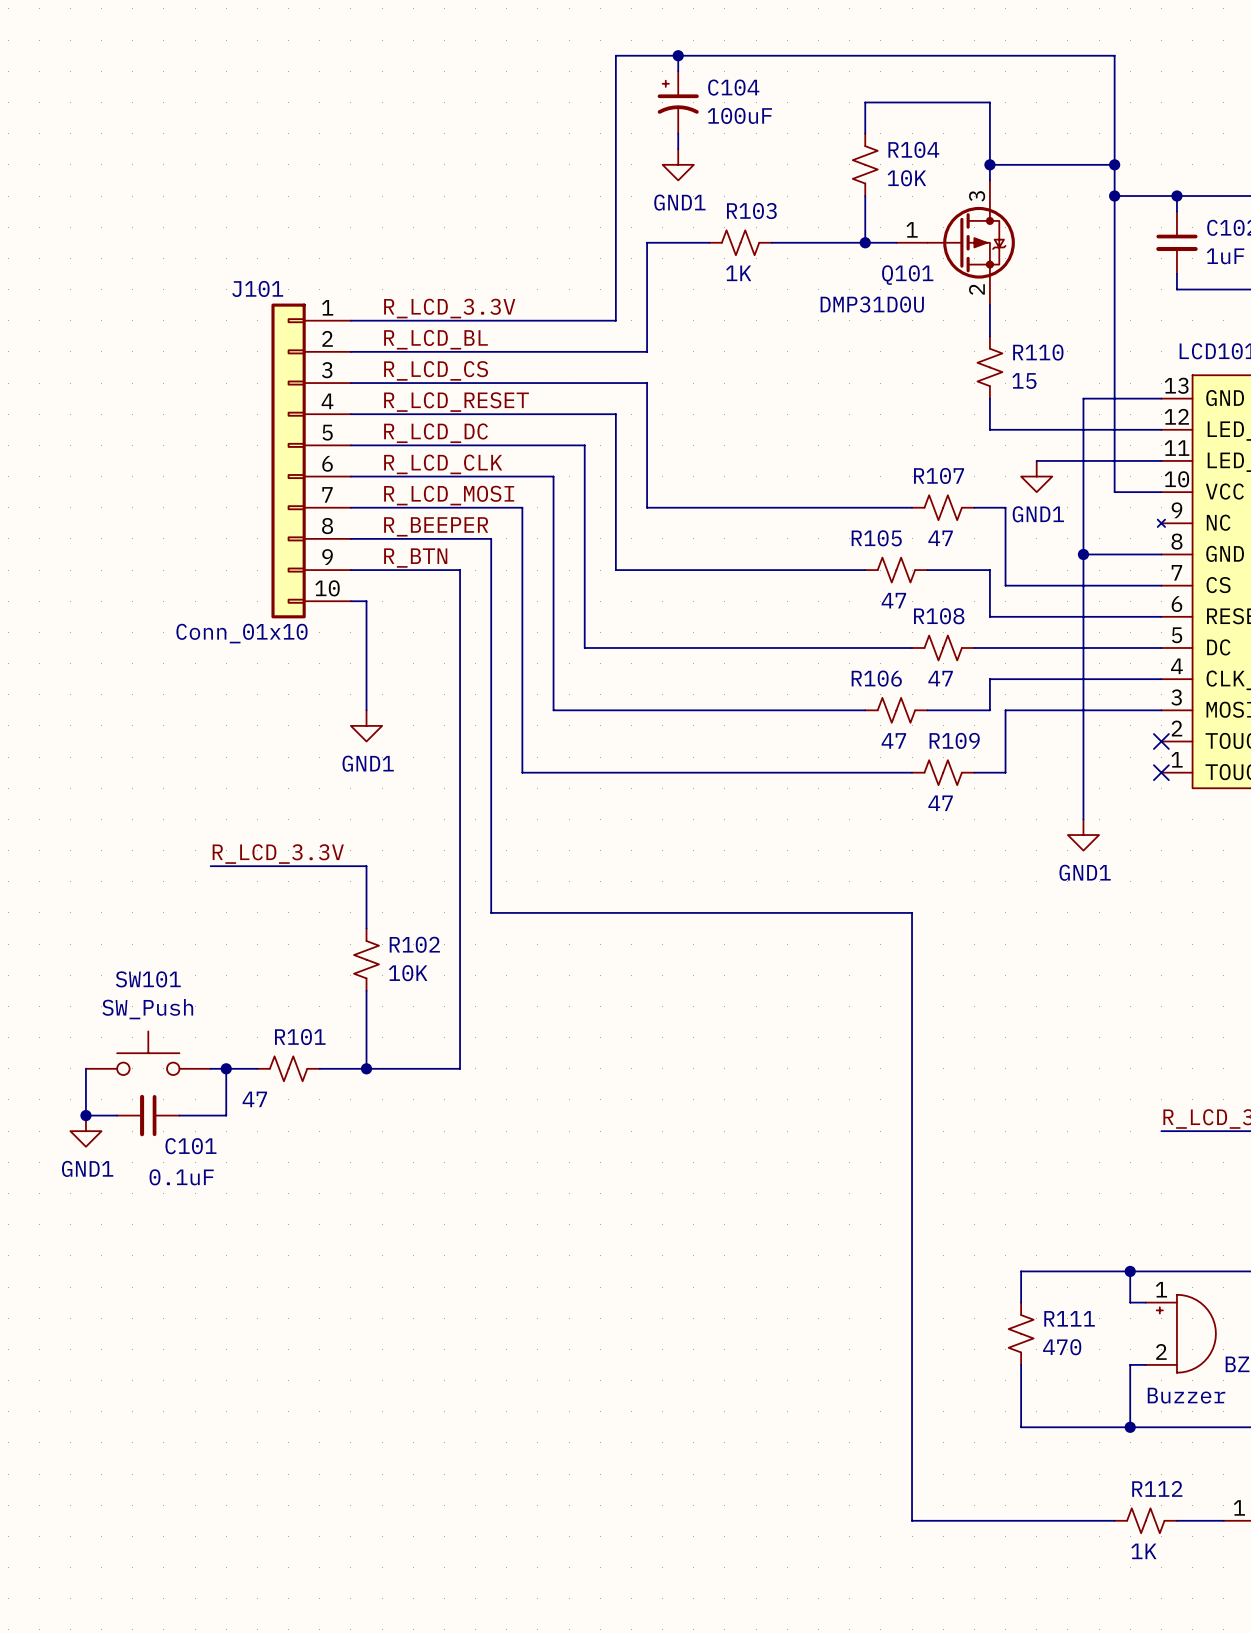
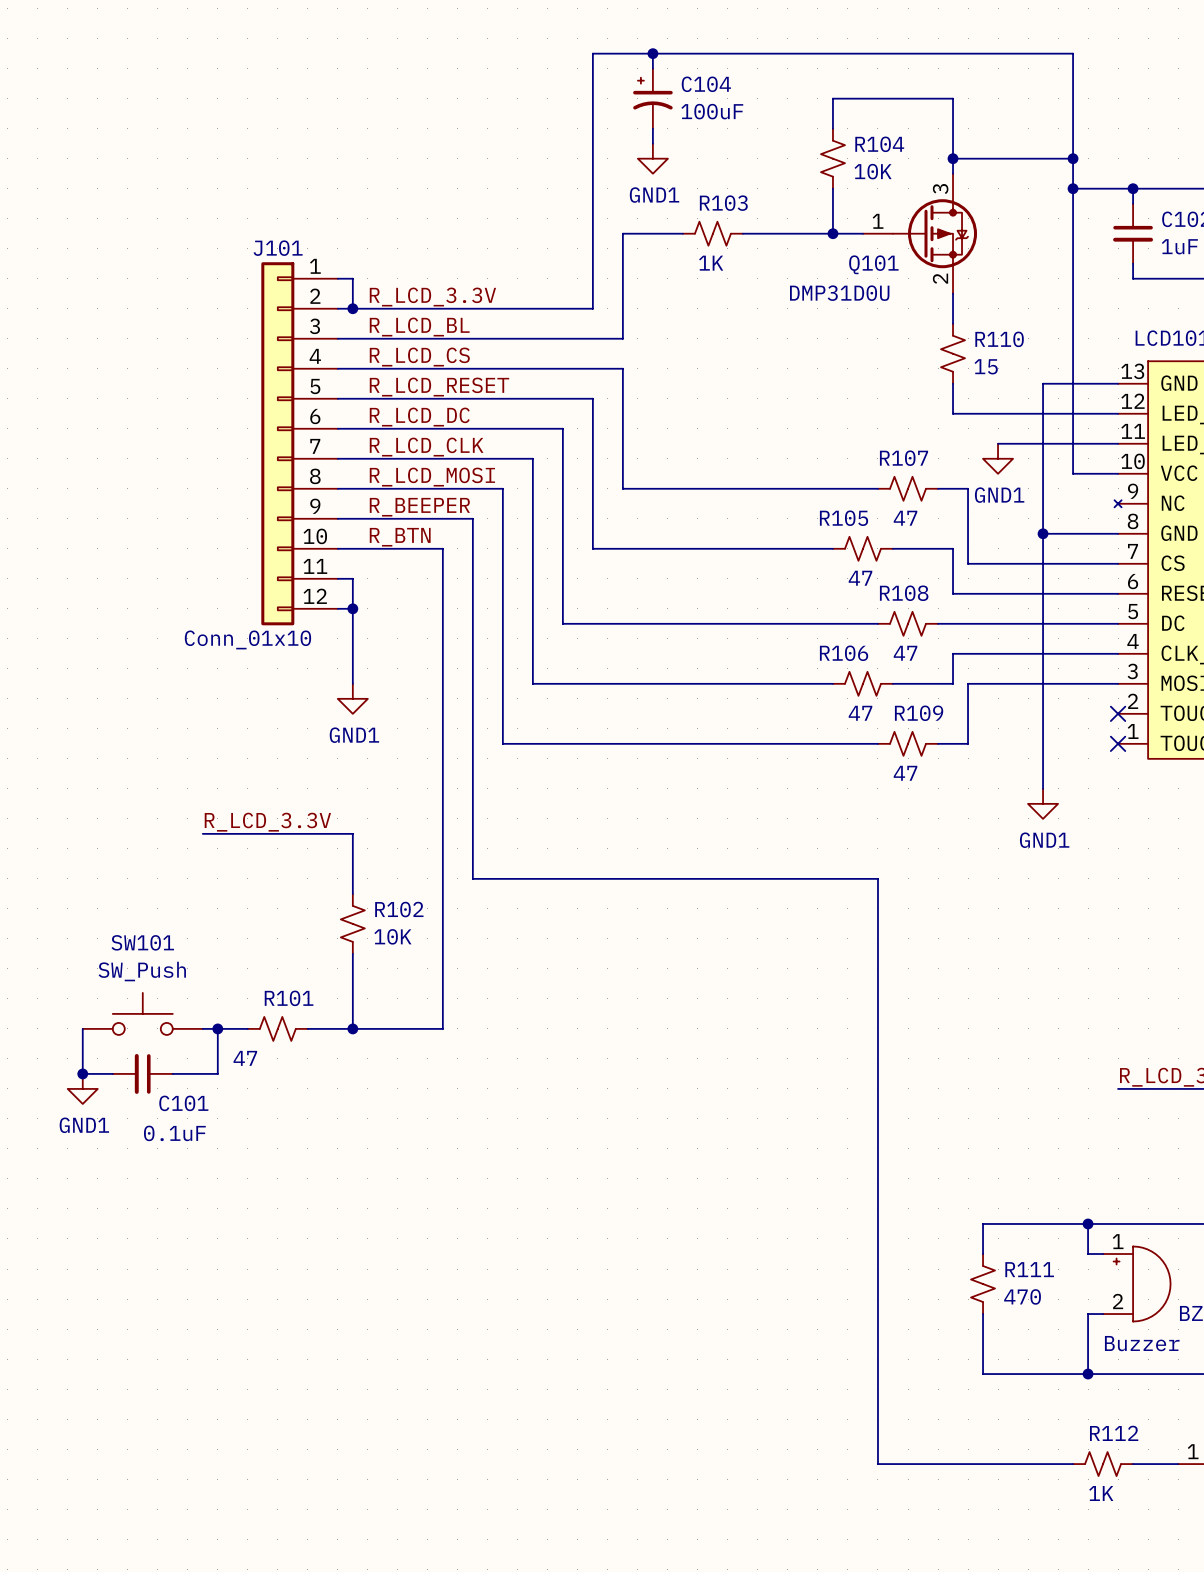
J101 name position: J101 (257, 288) -> J101 (278, 248)
wire: none -> (337, 278) (352, 278) (352, 308)
J101 symbol: [271, 303, 351, 619] -> [261, 262, 338, 626]
junction: none -> (352, 308)
wire: none -> (337, 608) (352, 608)
junction: none -> (352, 608)
J101 value position: Conn_01x10 (241, 633) -> Conn_01x10 (247, 639)

